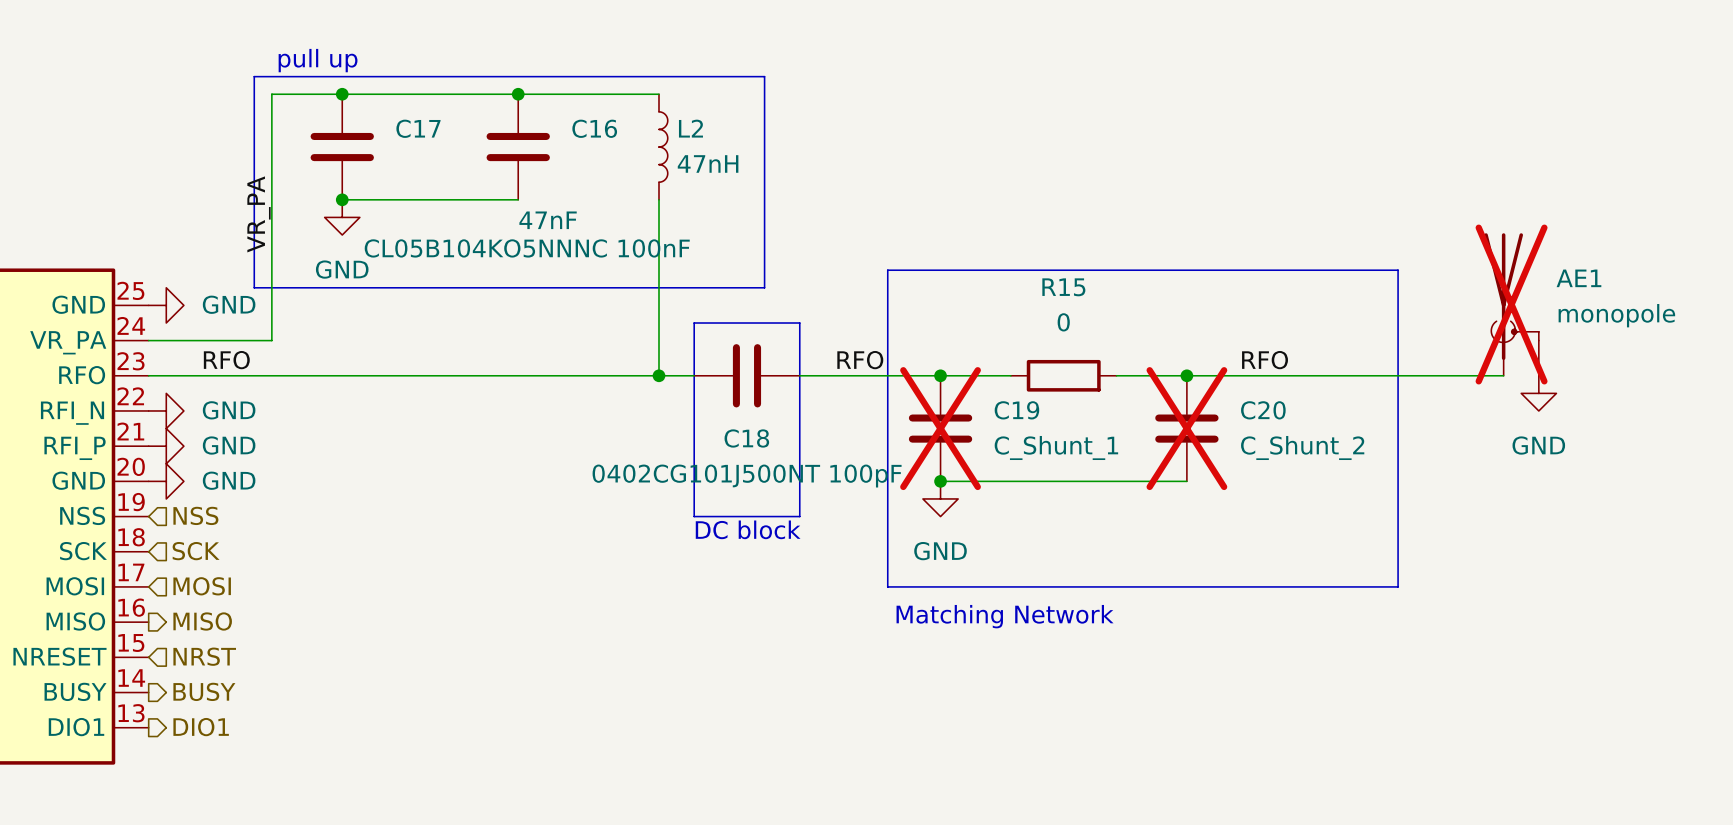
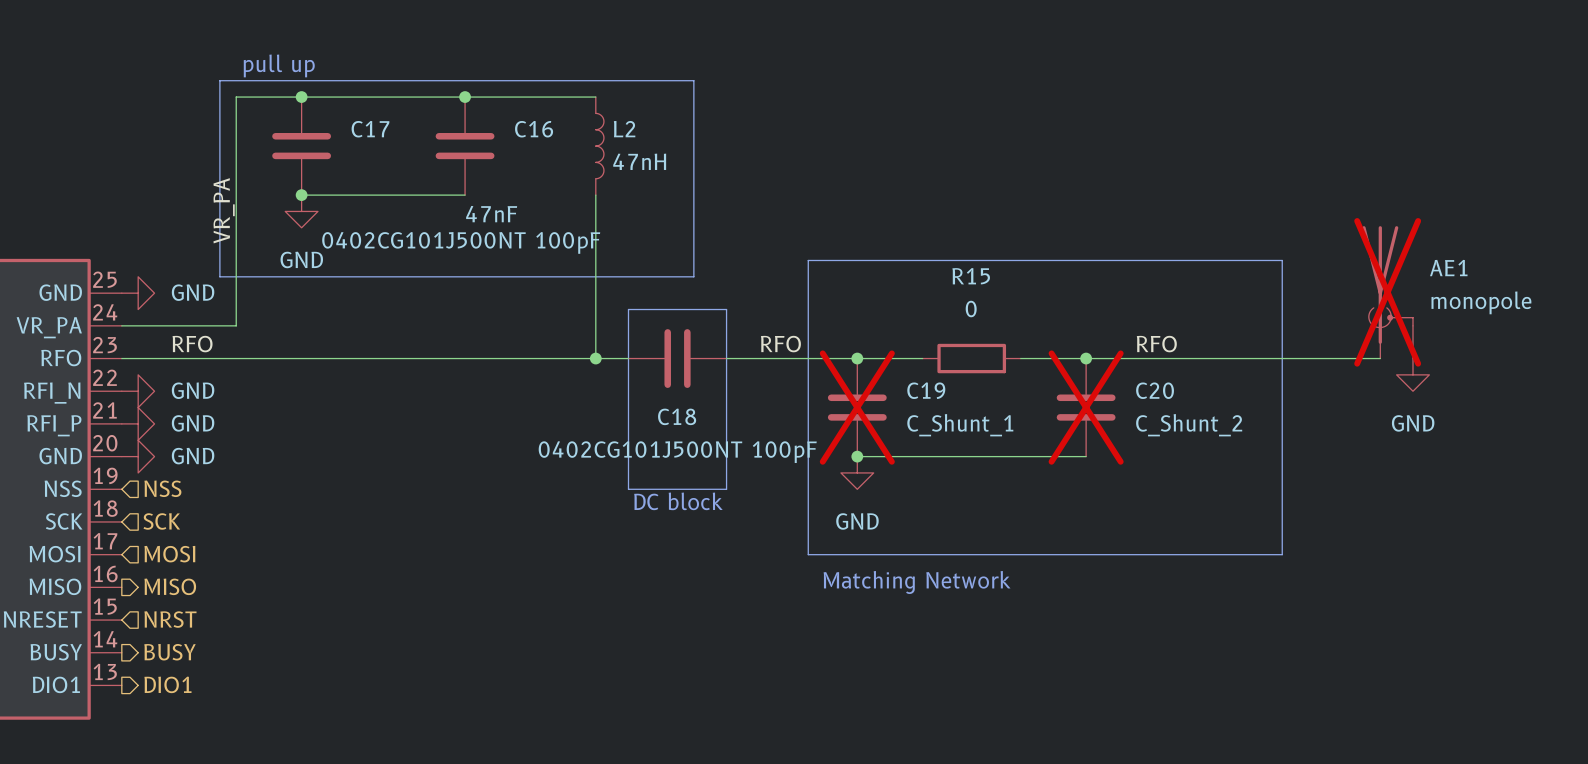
C17 value: CL05B104KO5NNNC 100nF (527, 248) -> 0402CG101J500NT 100pF (461, 242)

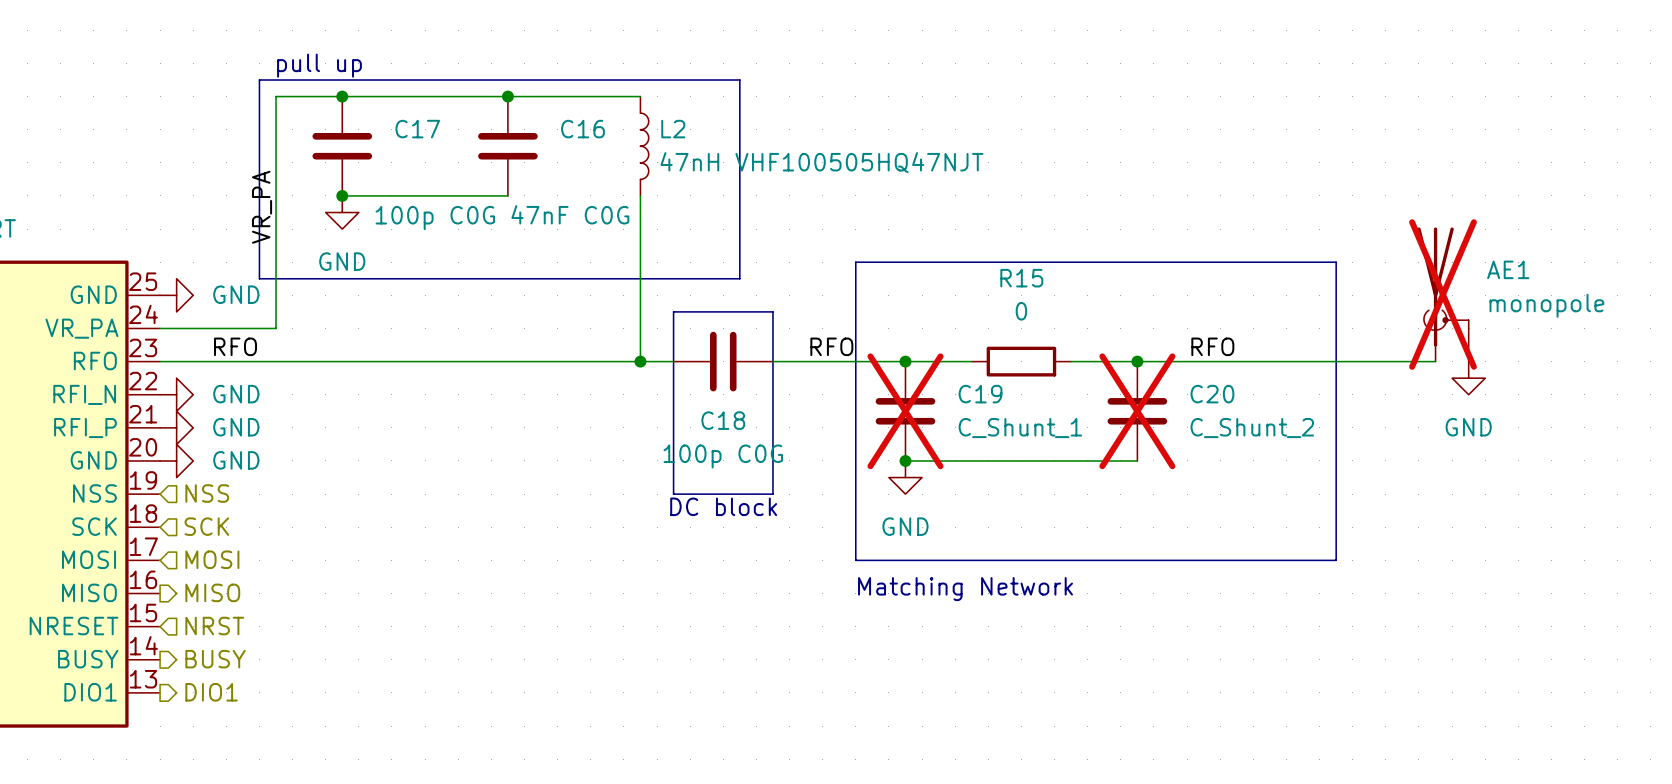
L2 value: 47nH (639, 161) -> 47nH VHF100505HQ47NJT (821, 162)
C16 value: 47nF (491, 214) -> 47nF C0G (570, 214)
C17 value: 0402CG101J500NT 100pF (461, 242) -> 100p C0G (435, 217)
C18 value: 0402CG101J500NT 100pF (677, 452) -> 100p C0G (723, 456)

